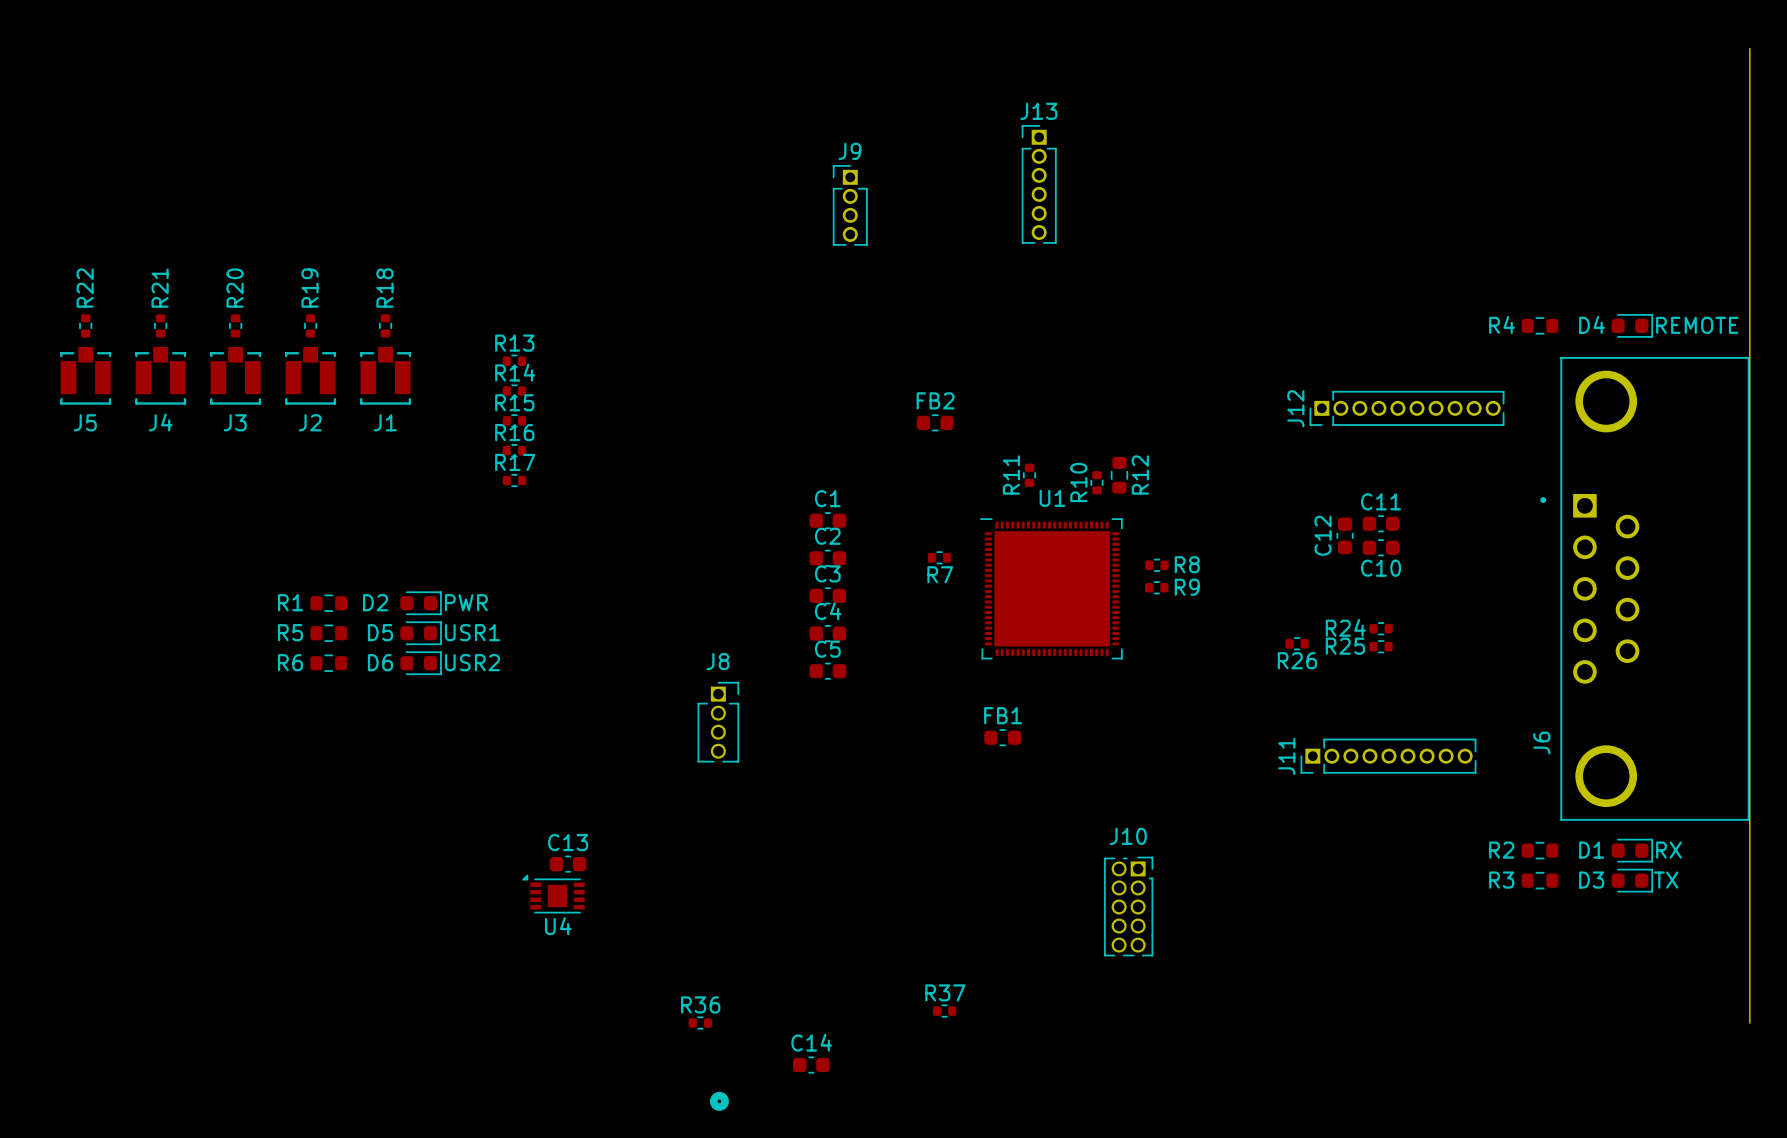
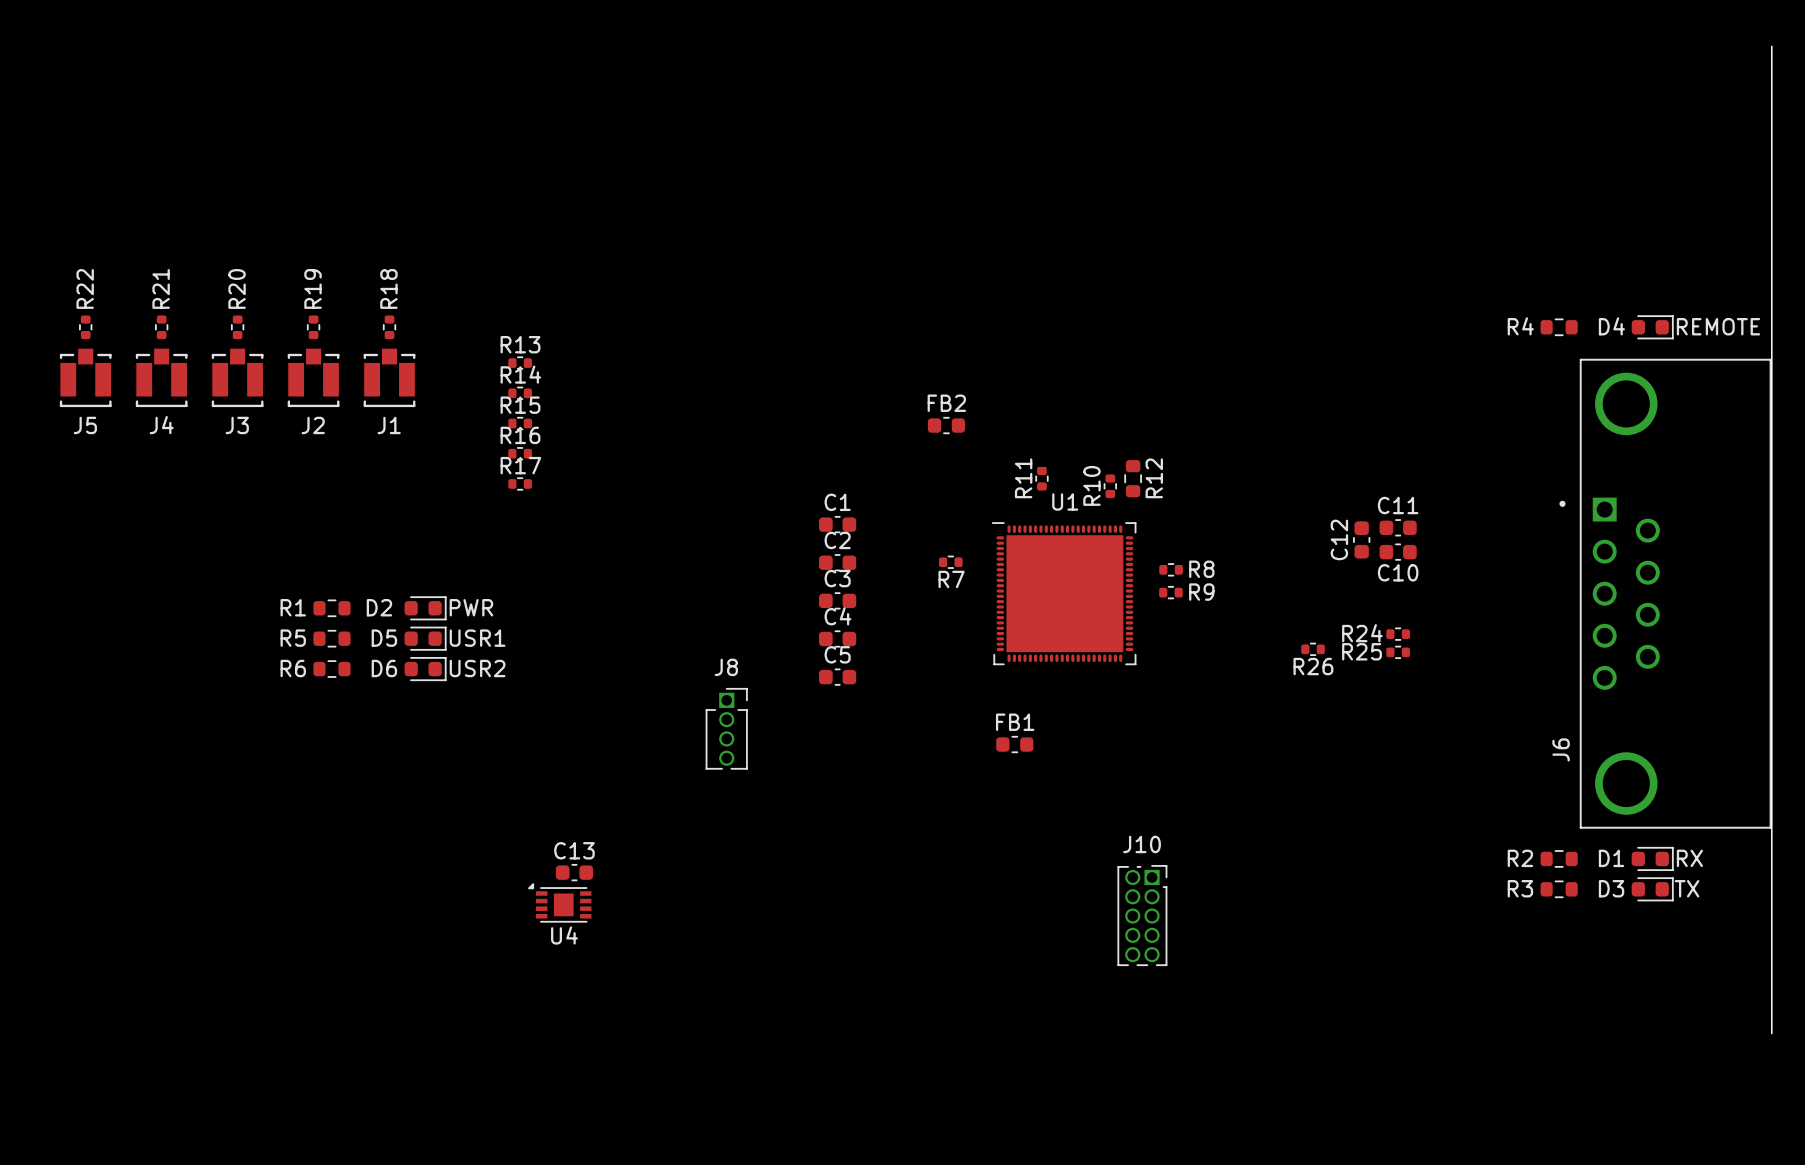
J13: (1039, 184) -> none
J9: (850, 205) -> none
J12: (1407, 408) -> none
J11: (1388, 756) -> none
R37: (944, 1011) -> none
R36: (700, 1023) -> none
C14: (811, 1065) -> none
part: (719, 1101) -> none

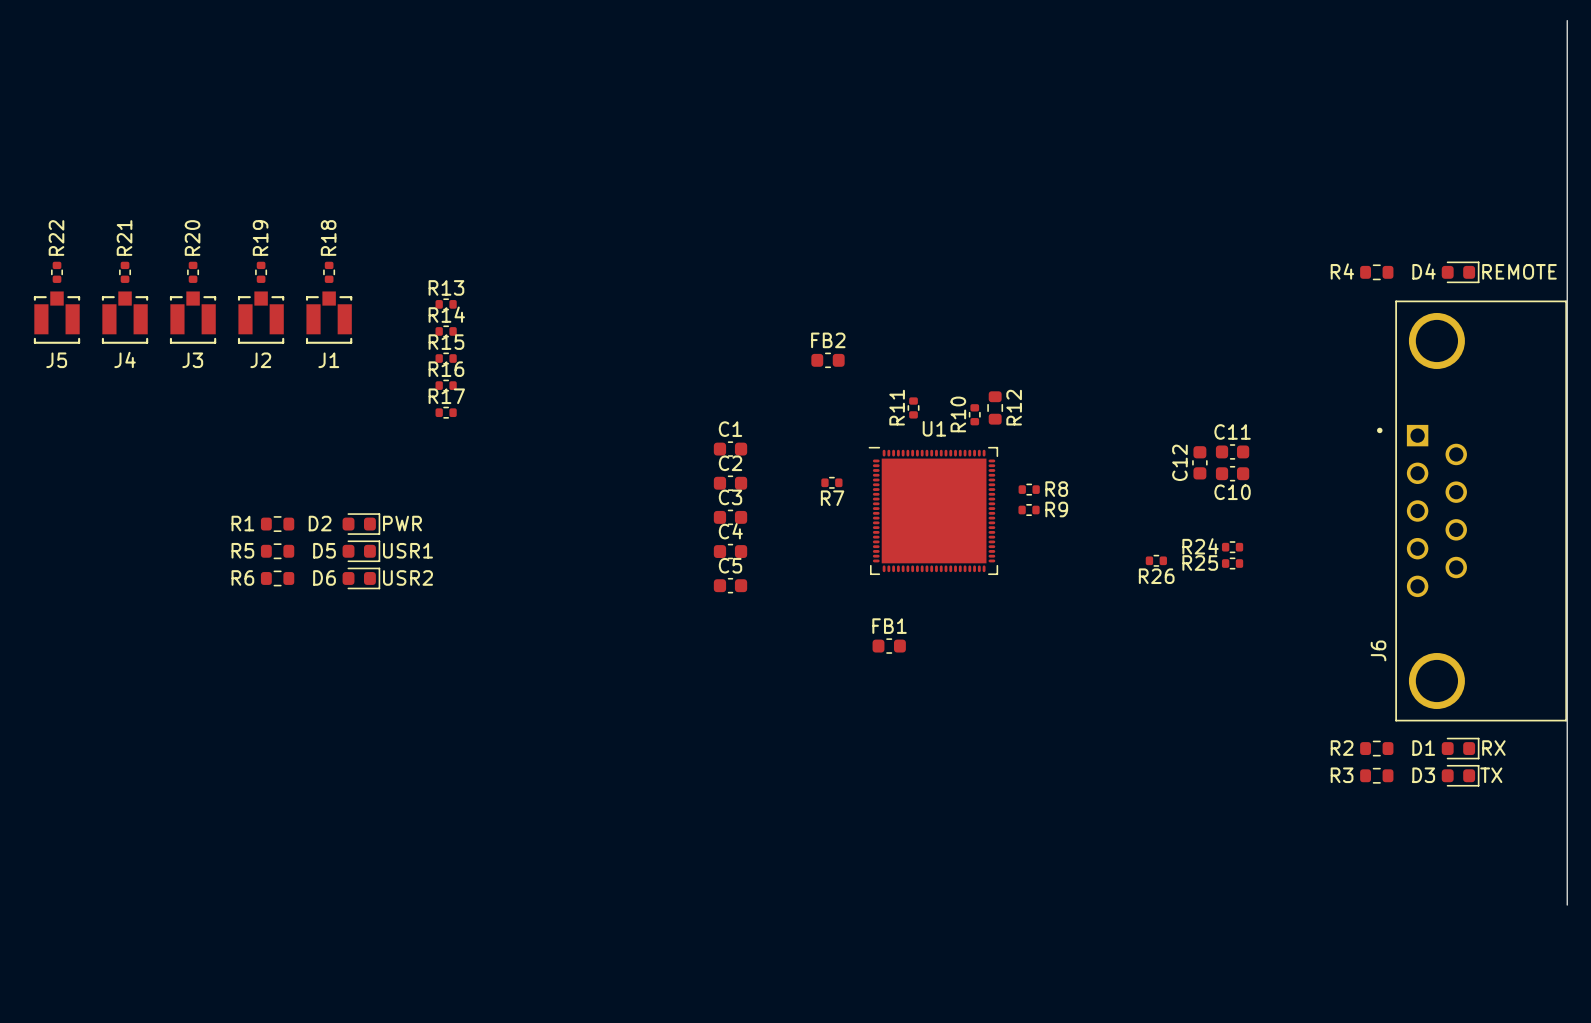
J8: (726, 728) -> none
C13: (574, 872) -> none
U4: (559, 902) -> none
J10: (1142, 915) -> none

